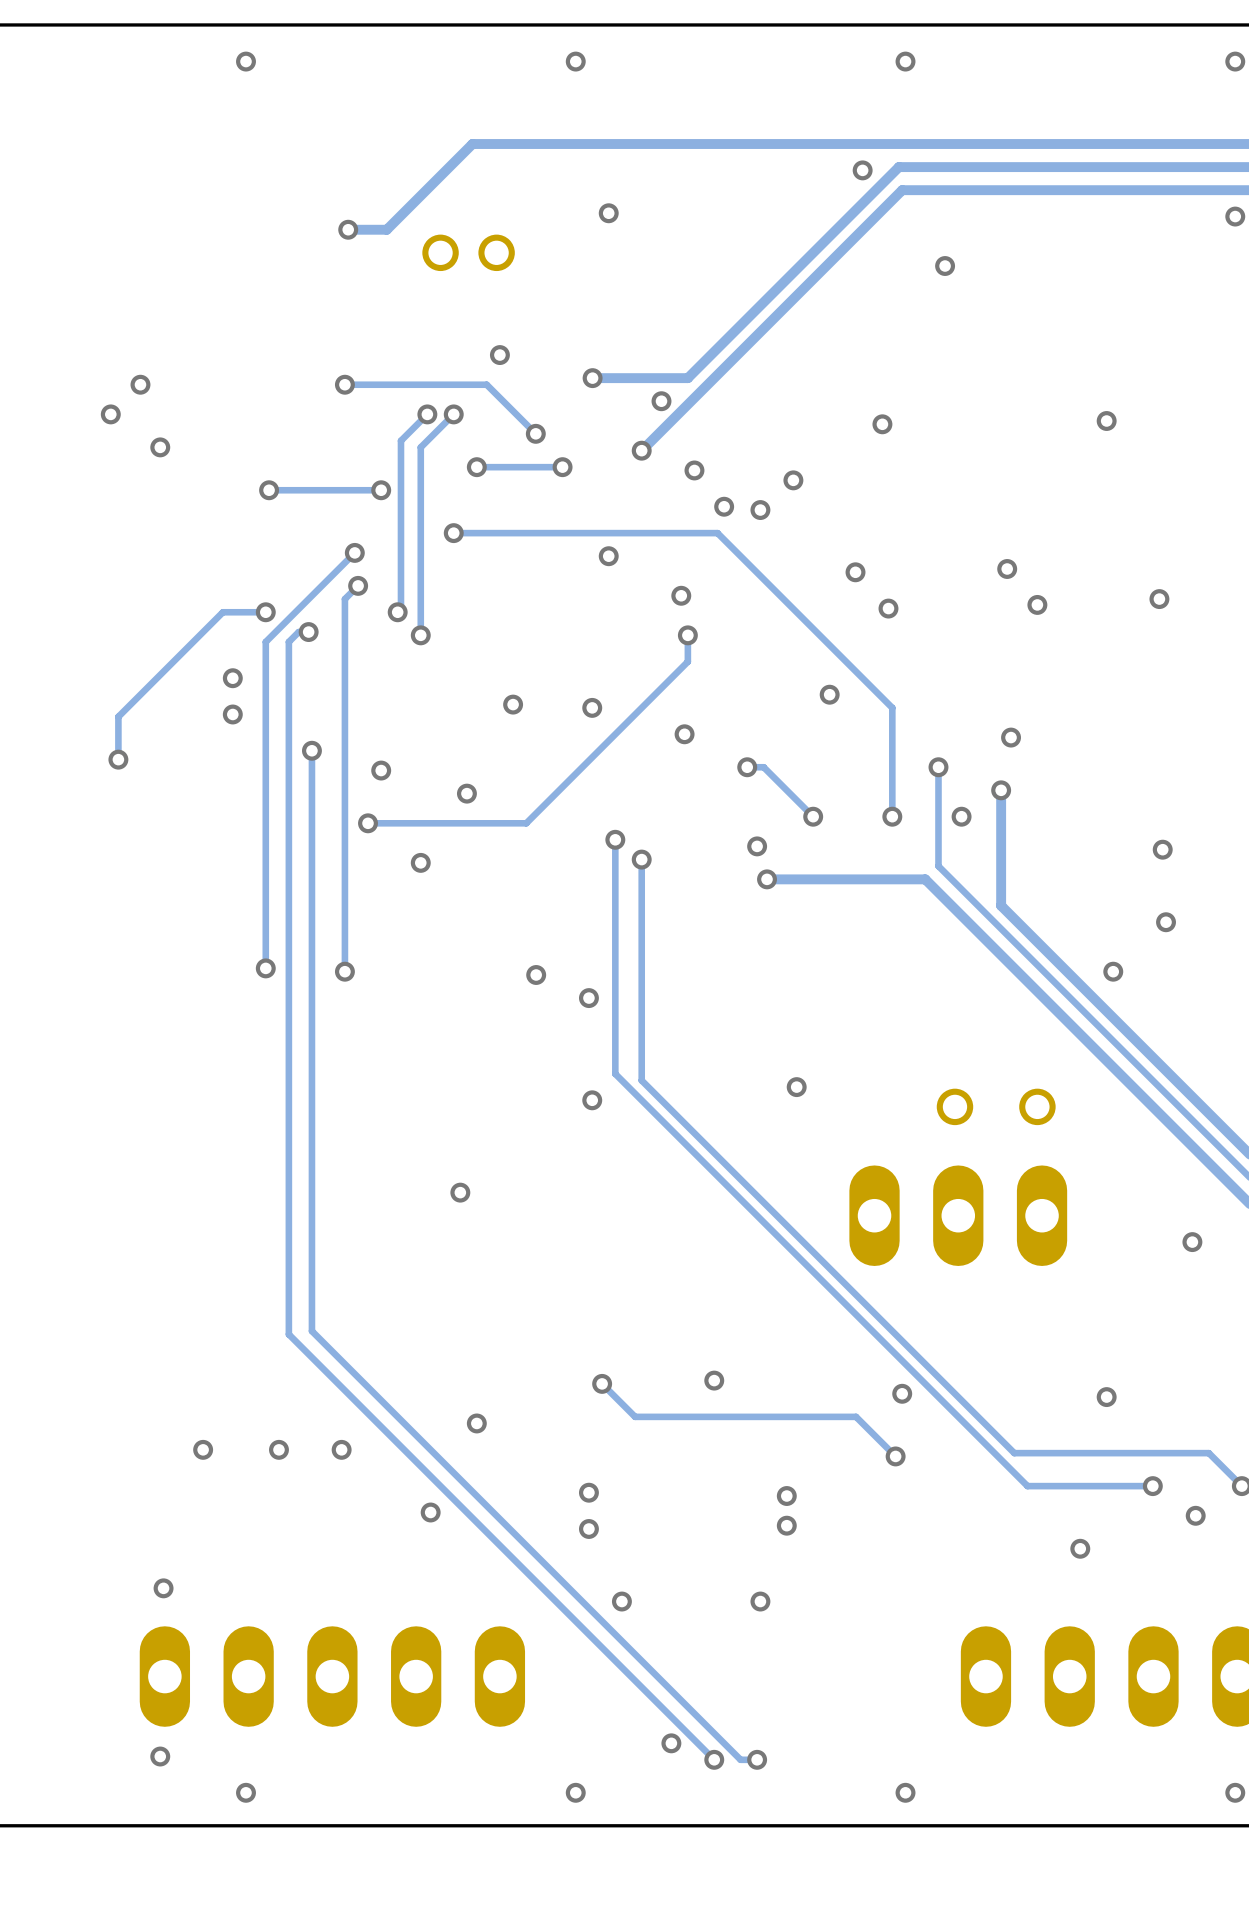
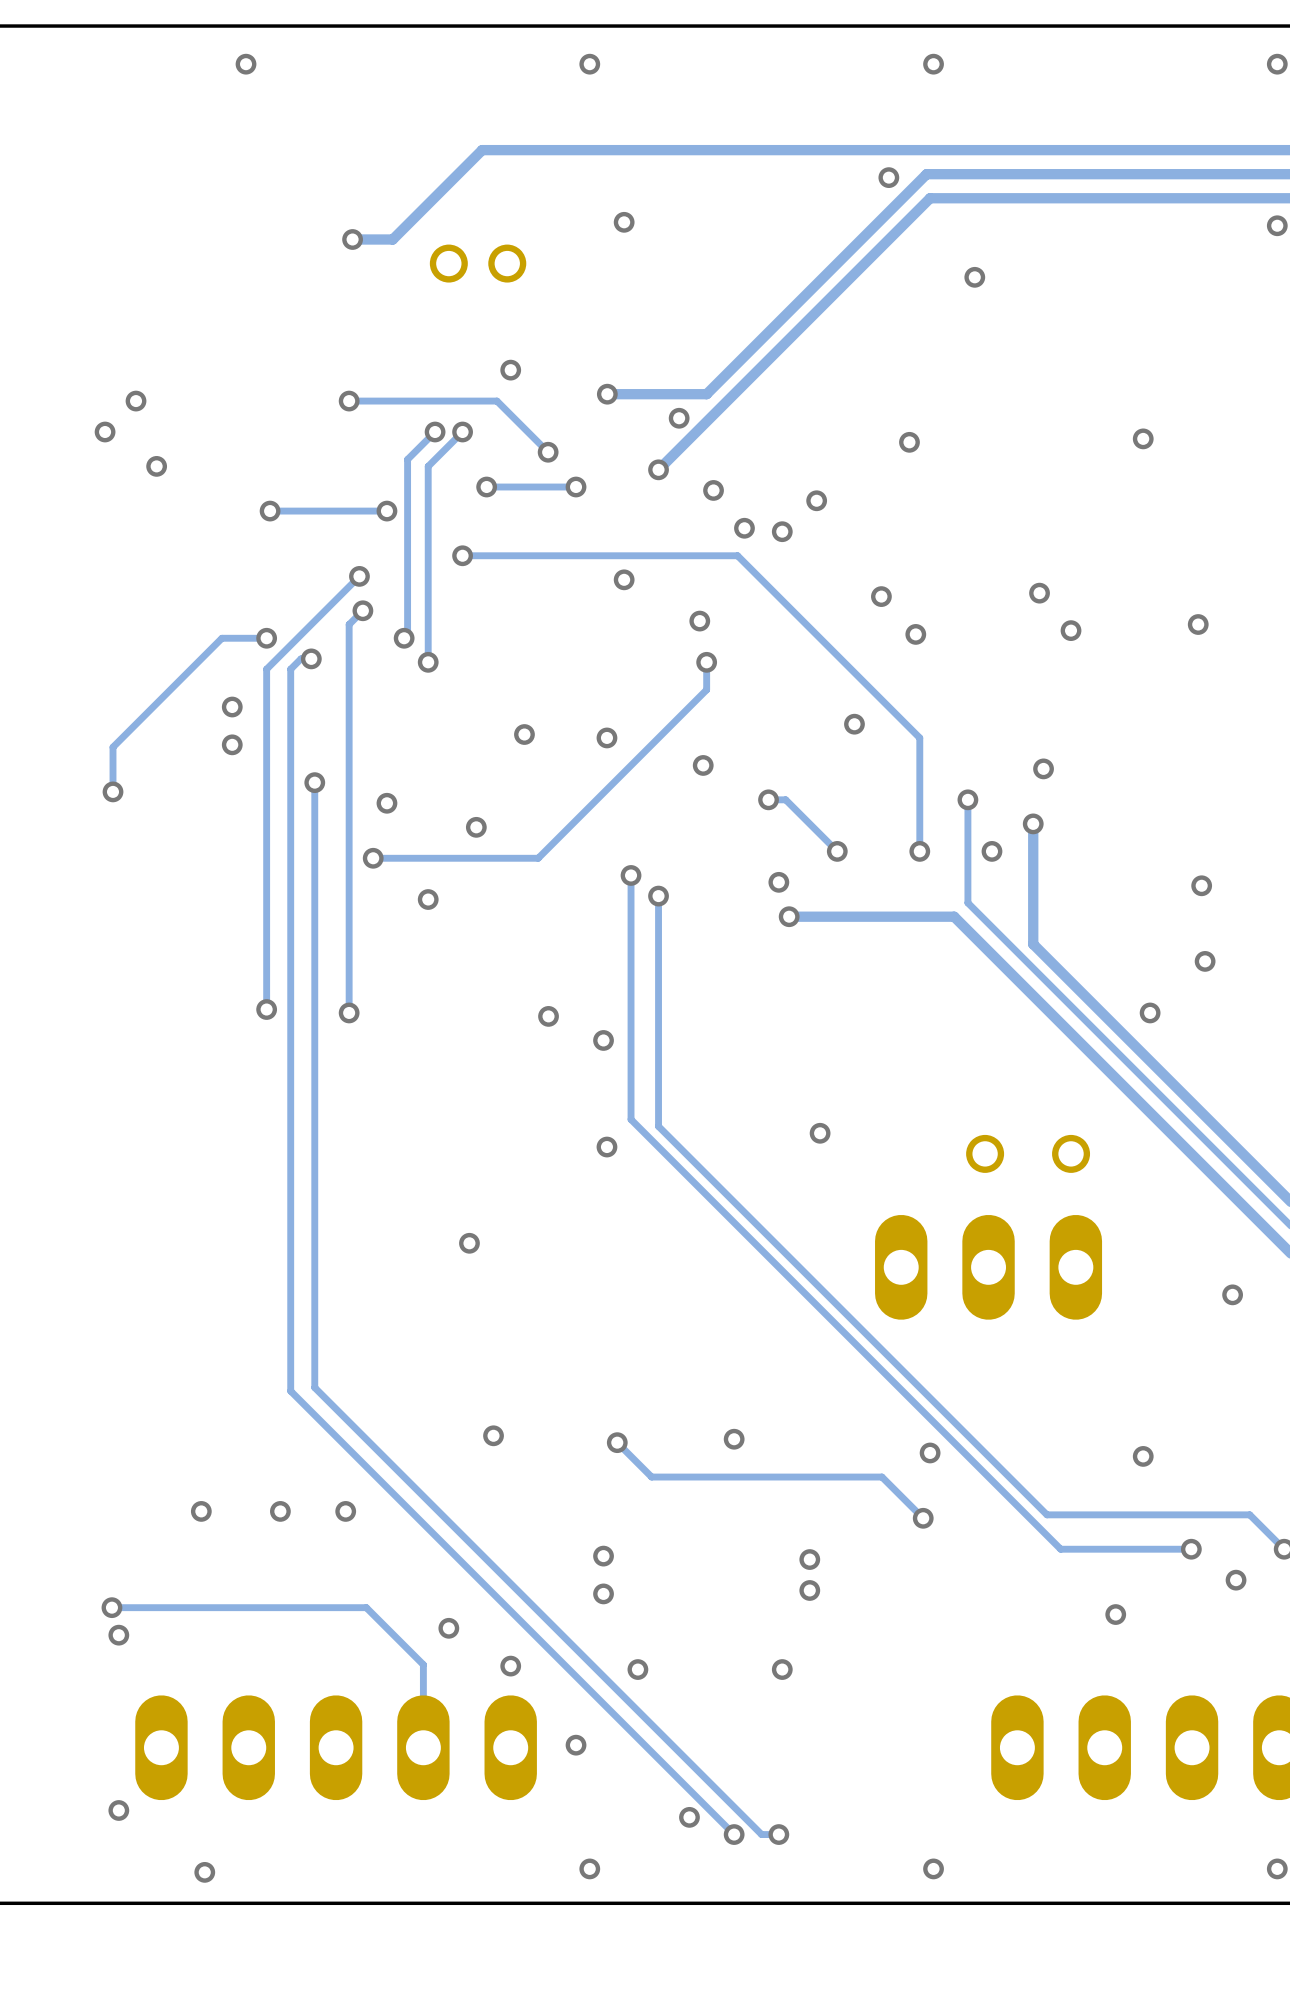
via position: (476, 1423) -> (493, 1435)
via position: (430, 1512) -> (448, 1628)
track: none -> (111, 1607) (366, 1607) (423, 1664) (423, 1747)
via: none -> (111, 1607)
via: none -> (118, 1635)
via: (163, 1588) -> none
via: none -> (510, 1666)
via: none -> (576, 1745)
via: none -> (118, 1810)
via: (160, 1756) -> none
via: (246, 1792) -> none
via: none -> (204, 1872)

